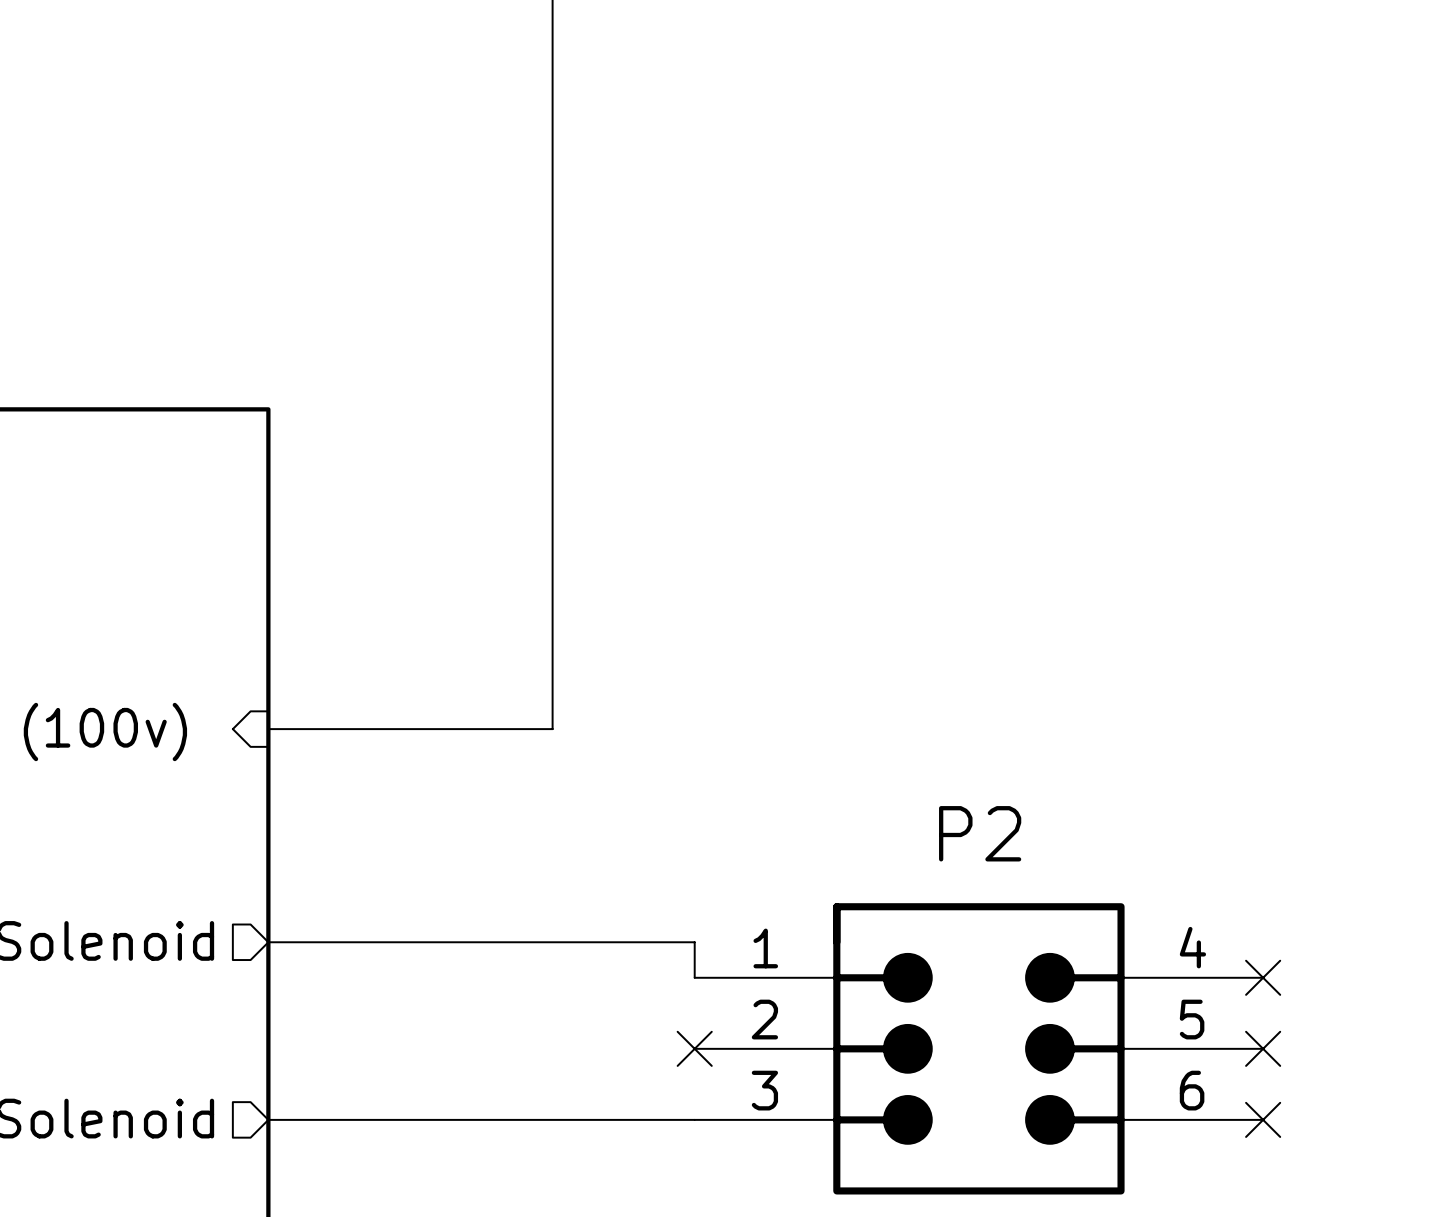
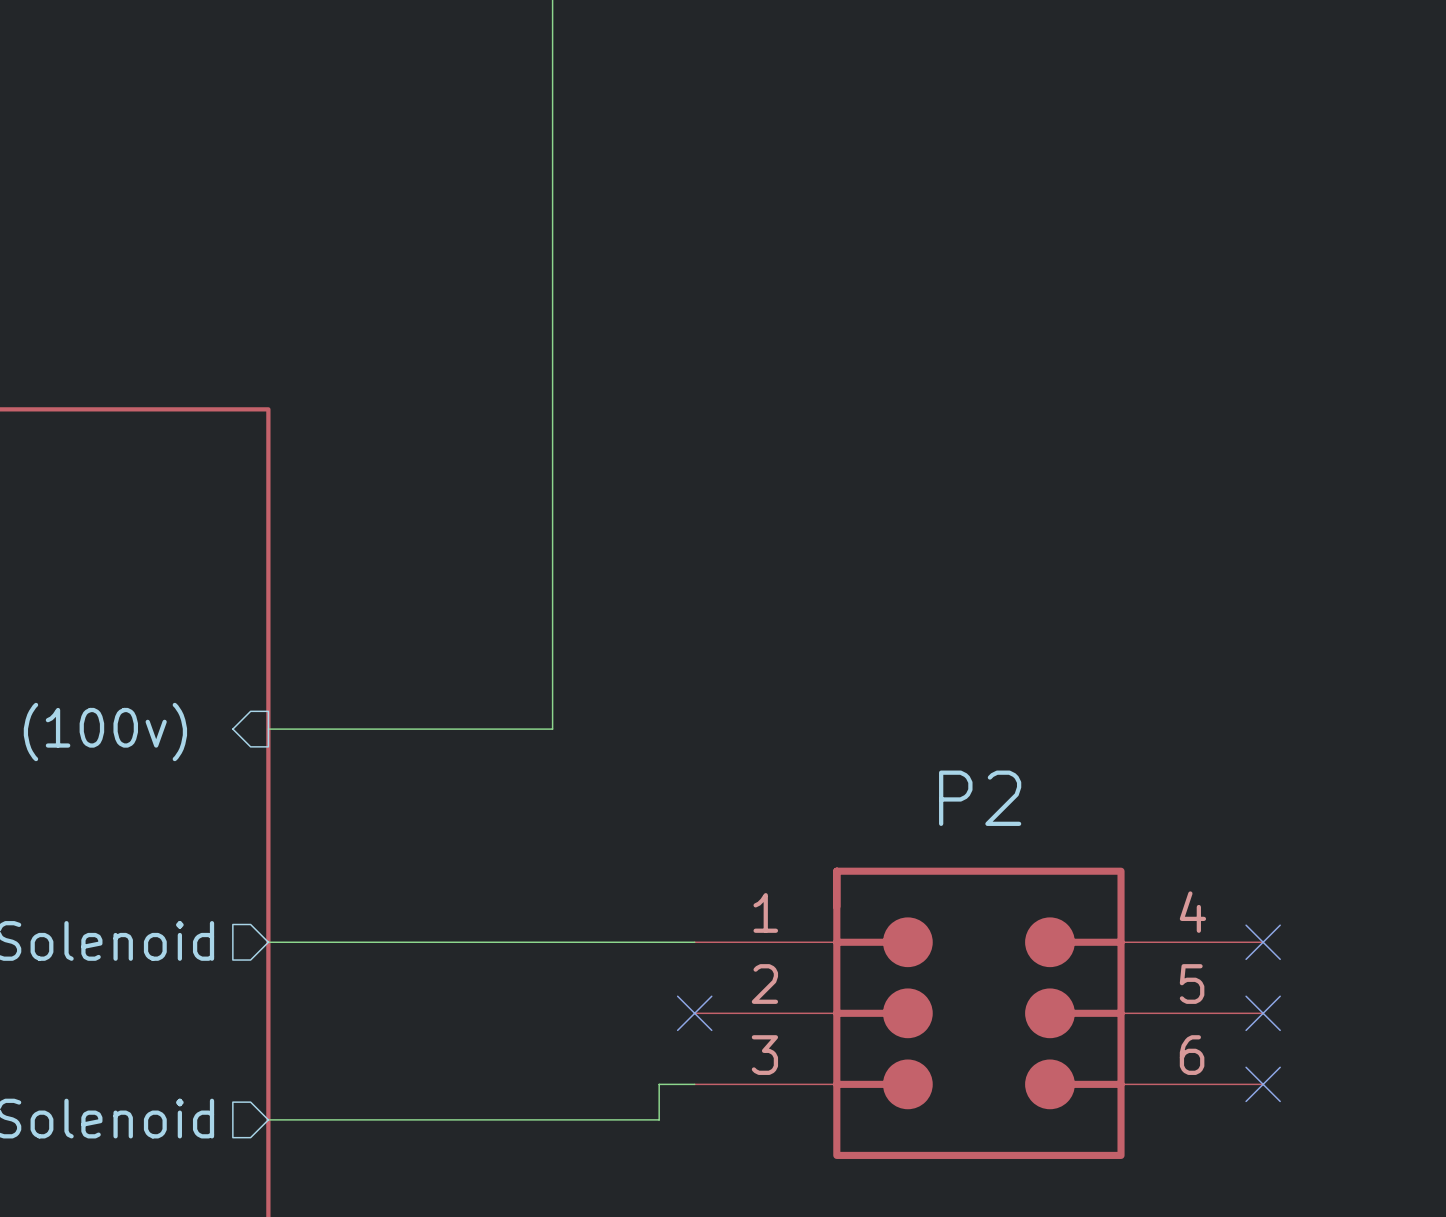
wire: (694, 942) (694, 977) -> none
no-connect mark: none -> (1263, 942)
no-connect mark: (1263, 977) -> none
no-connect mark: none -> (1263, 1013)
no-connect mark position: (694, 1048) -> (694, 1013)
P2 position: (978, 1048) -> (978, 1013)
no-connect mark: (1263, 1048) -> none
no-connect mark: none -> (1263, 1084)
wire: (659, 1119) (694, 1119) -> (659, 1119) (659, 1084) (694, 1084)
no-connect mark: (1263, 1119) -> none

